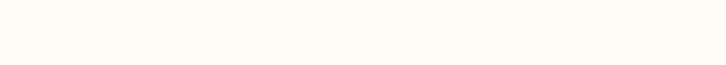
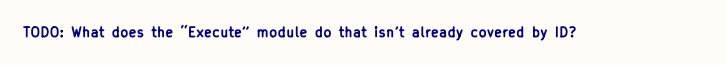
text: none -> TODO: What does the “Execute” module do that isn’t already covered by ID? (299, 32)

